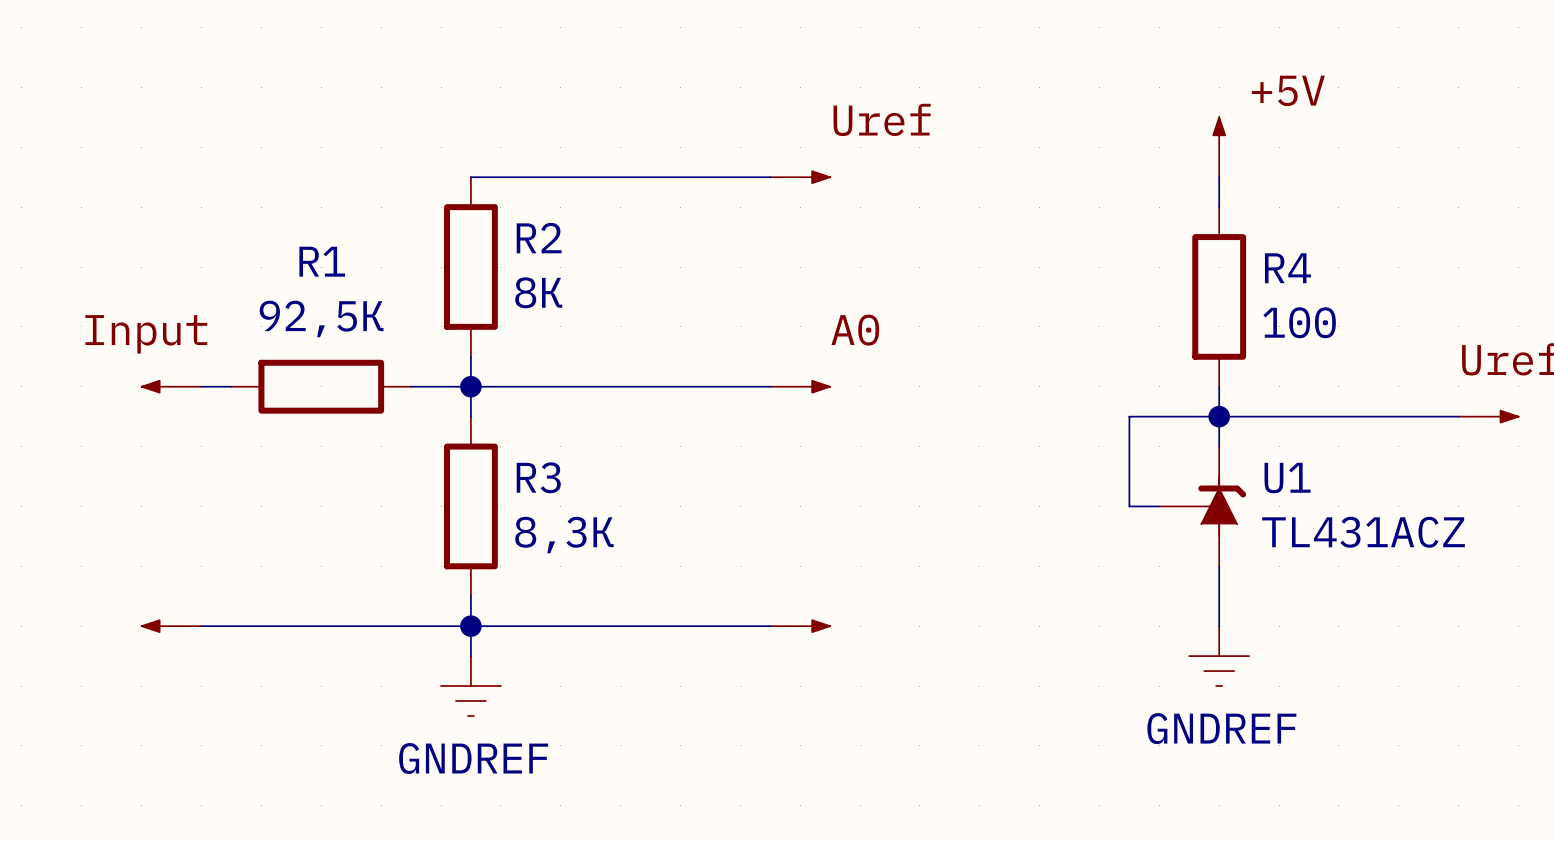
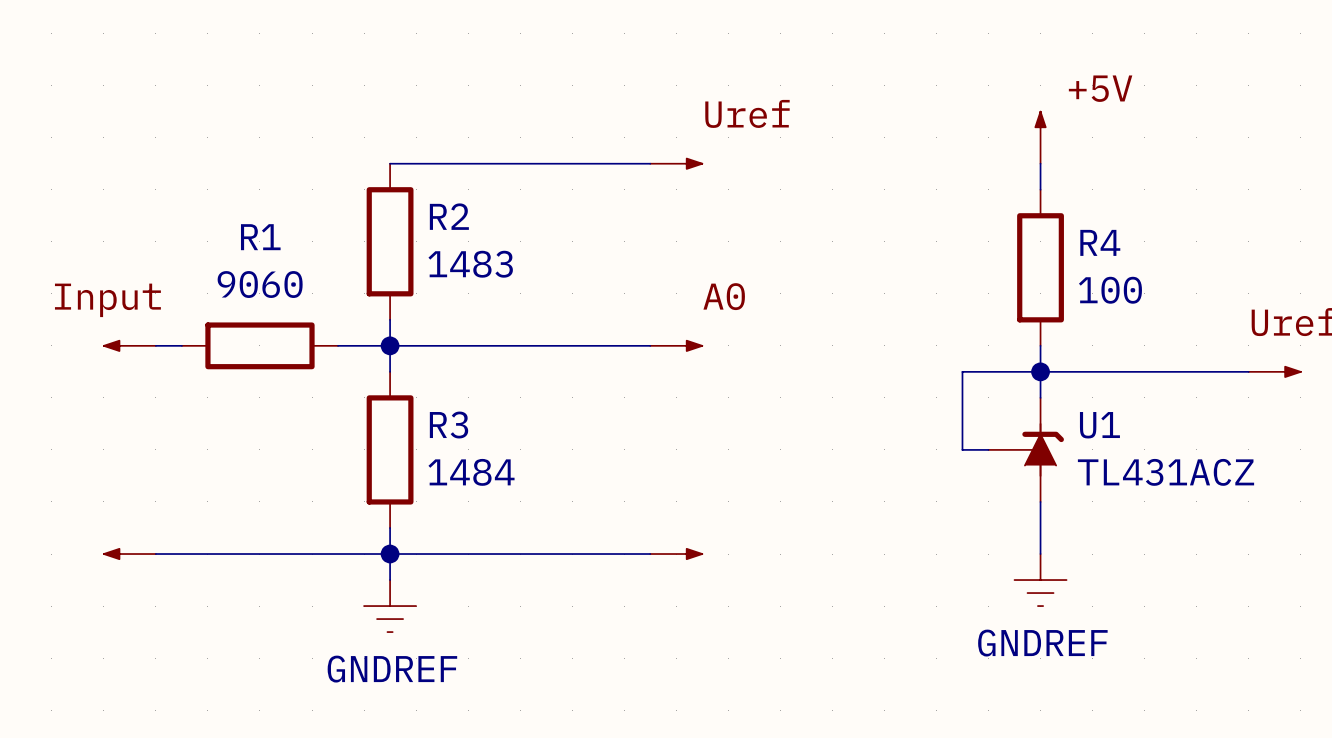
R2 value: 8К (538, 292) -> 1483 (470, 264)
R1 value: 92,5К (321, 318) -> 9060 (260, 284)
R3 value: 8,3К (564, 535) -> 1484 (471, 472)

